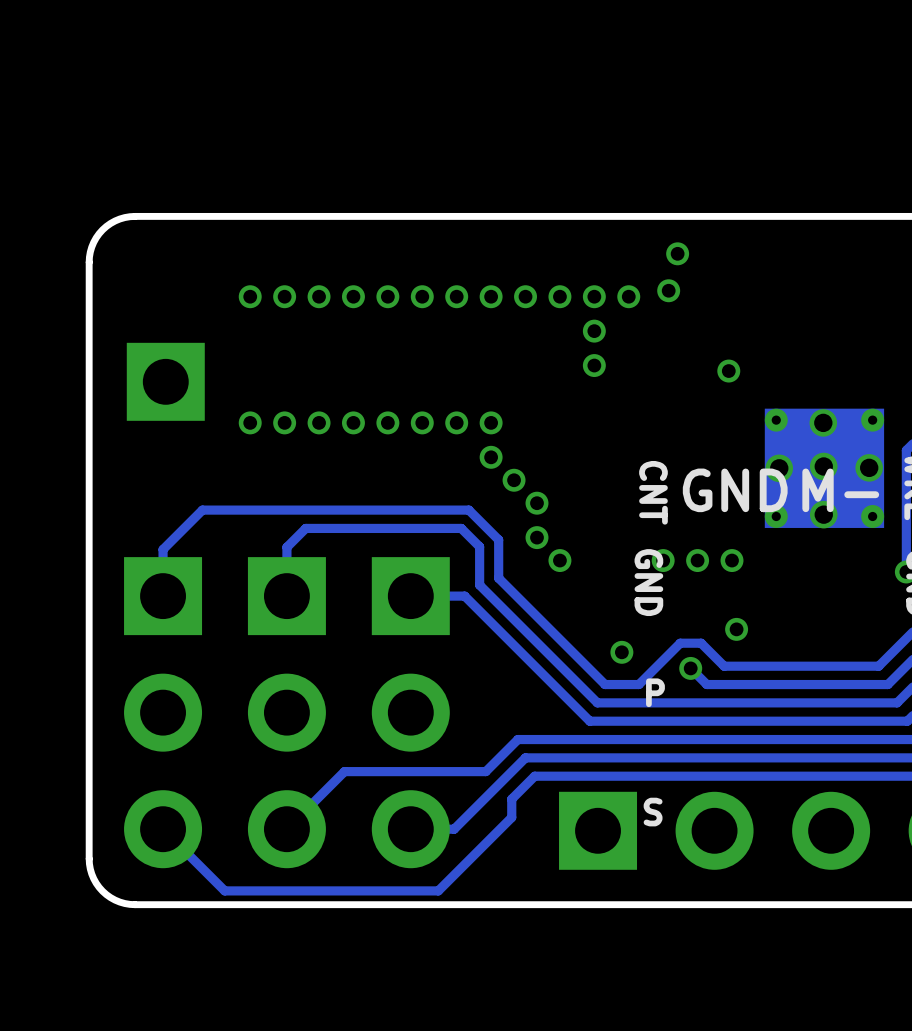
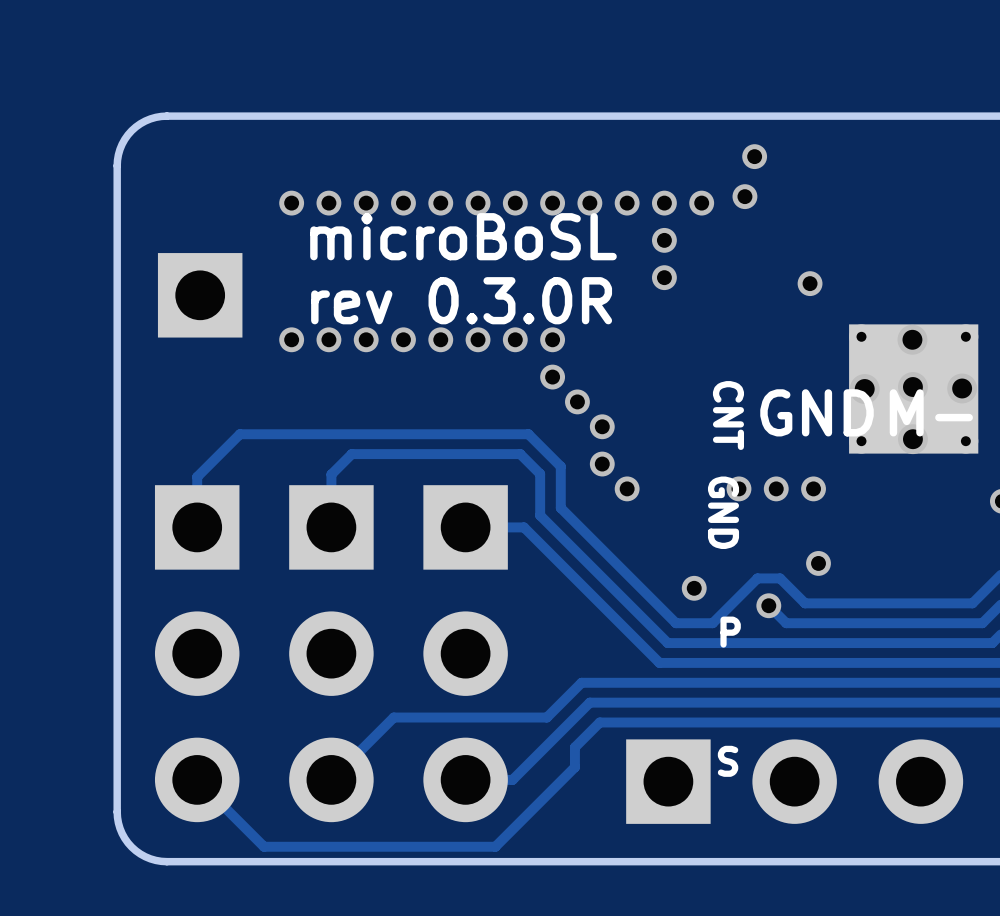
text: none -> microBoSL (463, 236)
text: none -> rev 0.3.0R (461, 300)

